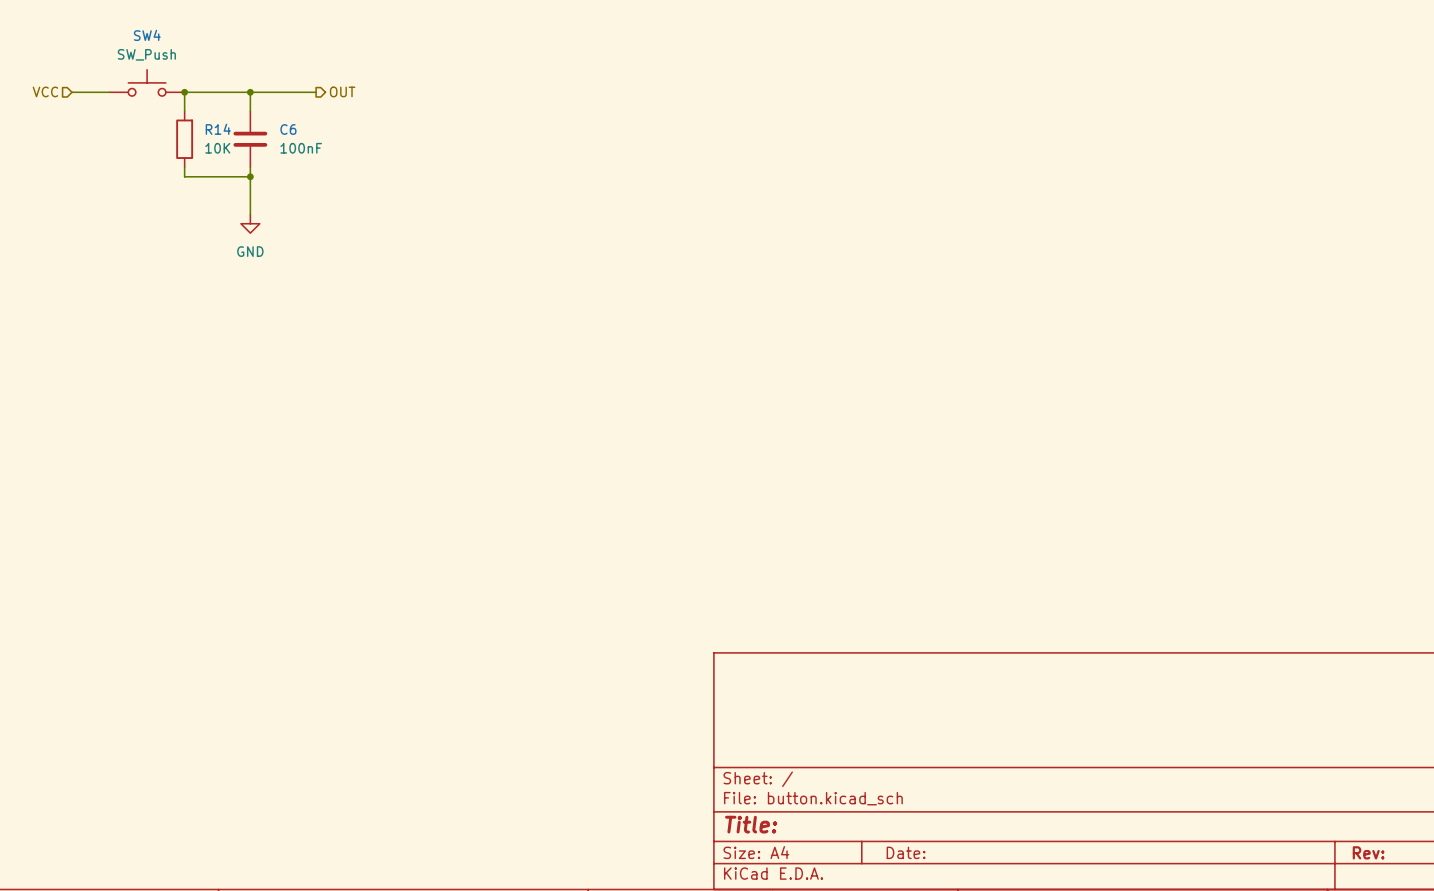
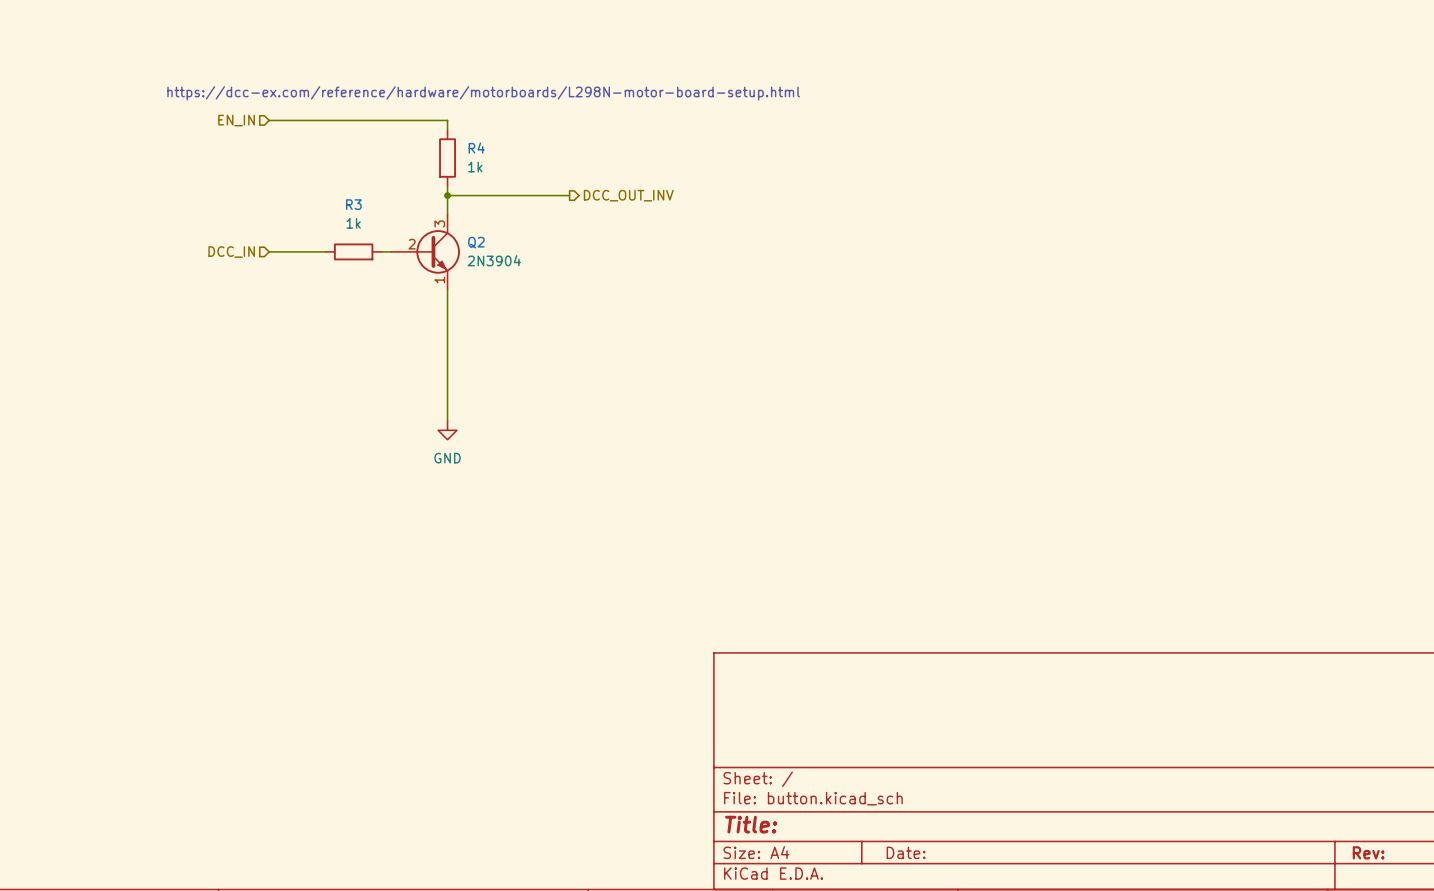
SW4: SW_Push (147, 82) -> none
hierarchical label: VCC (45, 91) -> none
hierarchical label: OUT (342, 91) -> none
wire: (71, 92) (109, 92) -> none
junction: (184, 92) -> none
wire: (250, 92) (250, 111) -> none
junction: (250, 92) -> none
wire: (316, 92) (184, 92) (184, 111) -> none
text: none -> https://dcc-ex.com/reference/hardware/motorboards/L298N-motor-board-setup.html (483, 93)
hierarchical label: none -> EN_IN (236, 120)
wire: none -> (269, 120) (447, 120) (447, 129)
R14: 10K (184, 139) -> none
C6: 100nF (250, 139) -> none
R4: none -> 1k (447, 158)
wire: (184, 167) (184, 176) (250, 176) -> none
wire: (250, 167) (250, 214) -> none
junction: (250, 176) -> none
wire: none -> (447, 186) (447, 214)
wire: none -> (447, 195) (569, 195)
junction: none -> (447, 195)
hierarchical label: none -> DCC_OUT_INV (628, 195)
power symbol: GND (250, 223) -> none
wire: none -> (269, 251) (325, 251)
R3: none -> 1k (353, 251)
wire: none -> (381, 251) (391, 251)
Q2: none -> 2N3904 (425, 251)
hierarchical label: none -> DCC_IN (231, 252)
wire: none -> (447, 289) (447, 420)
power symbol: none -> GND (447, 430)

